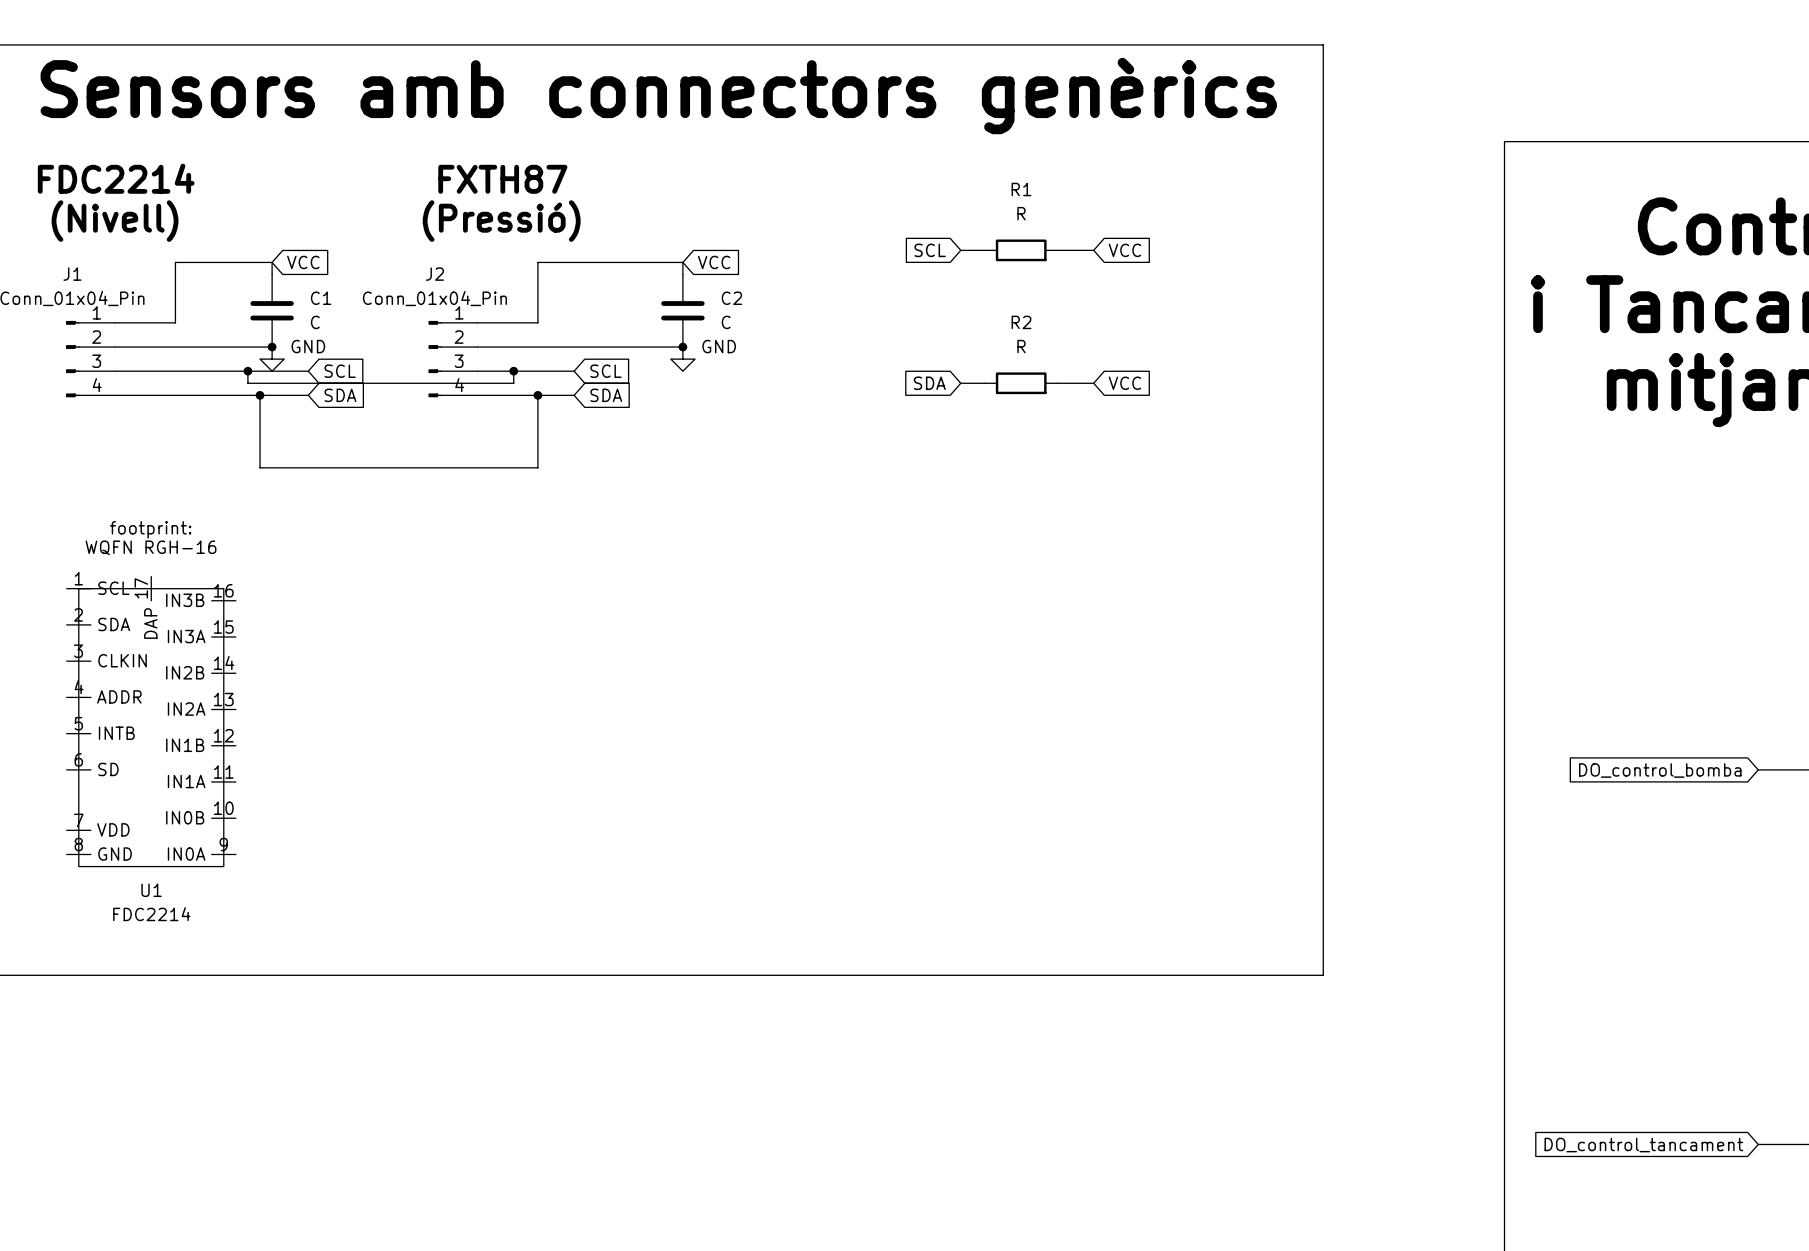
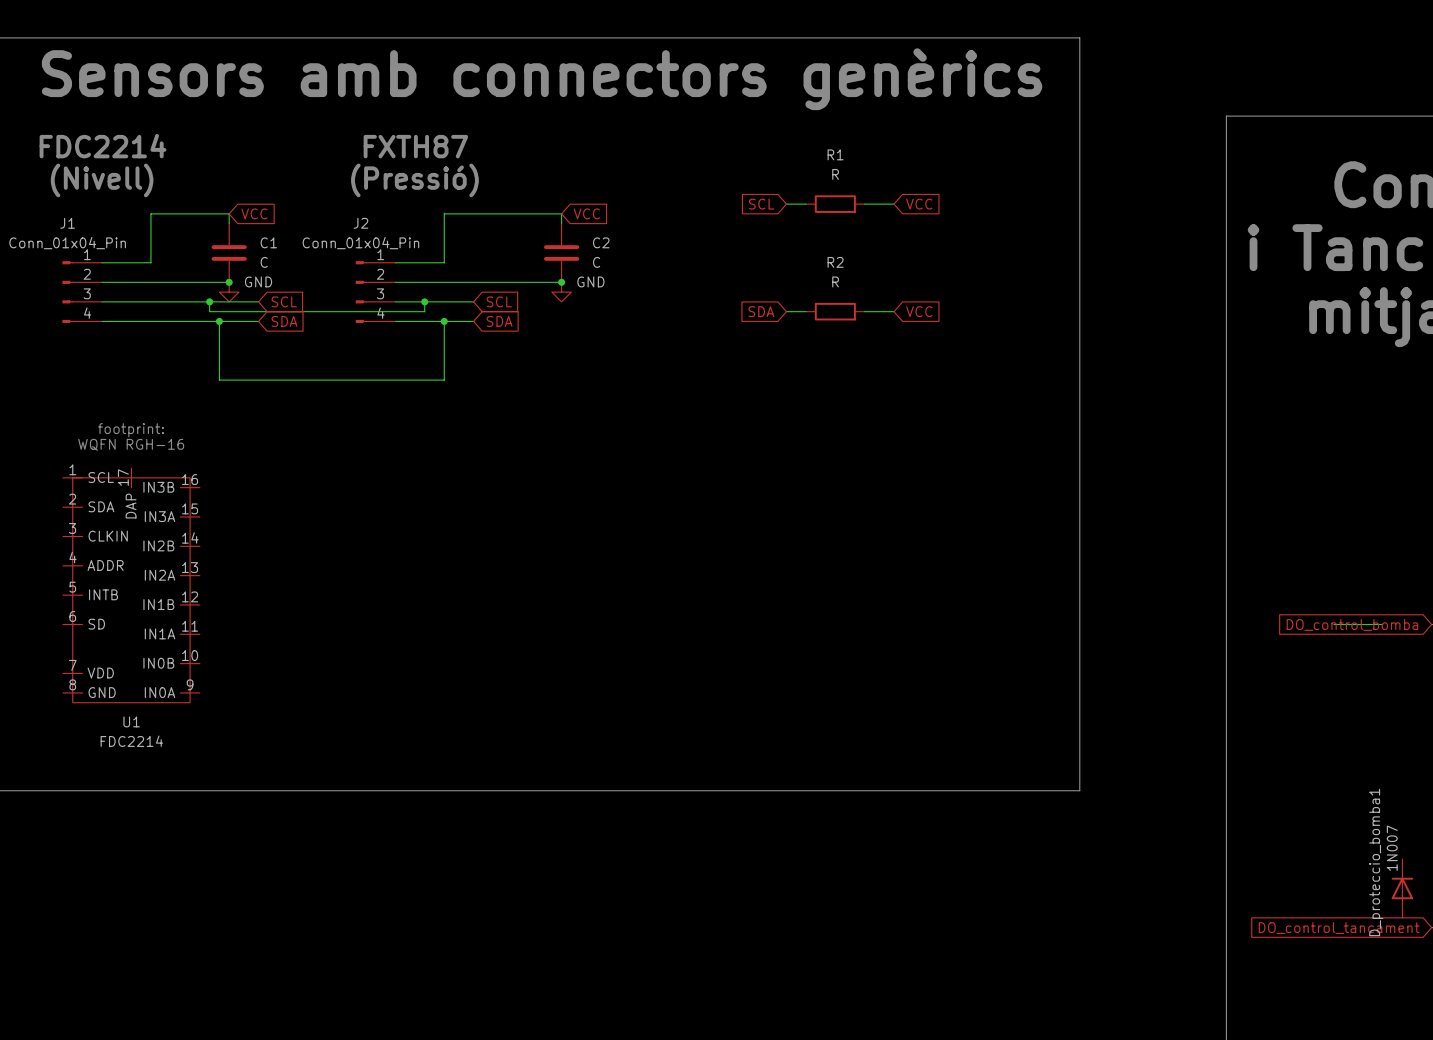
wire: none -> (1333, 624) (1382, 624)
D_proteccio_bomba1: none -> 1N007 (1402, 888)

